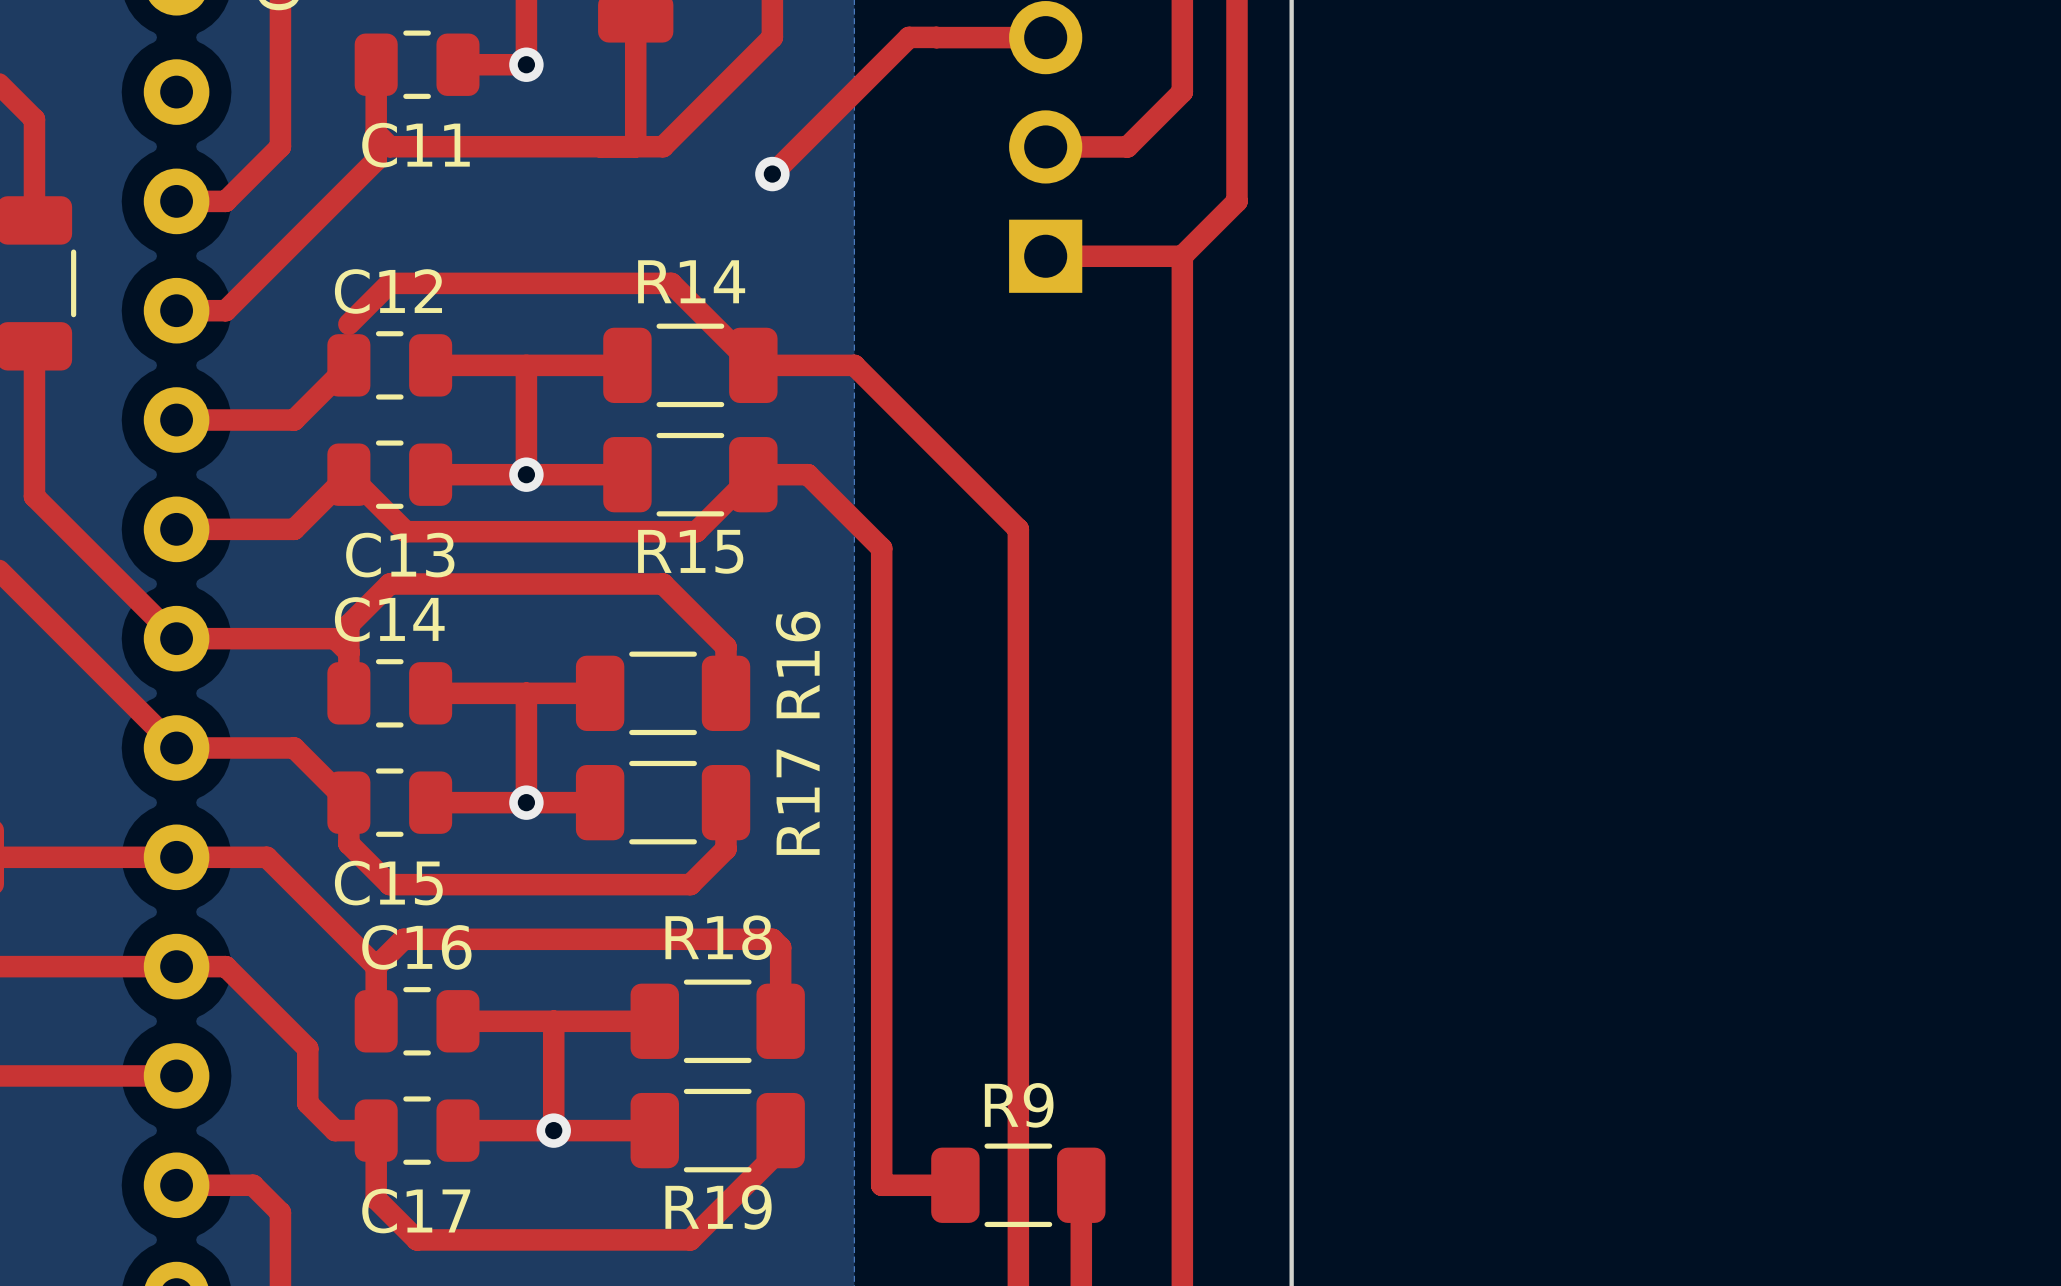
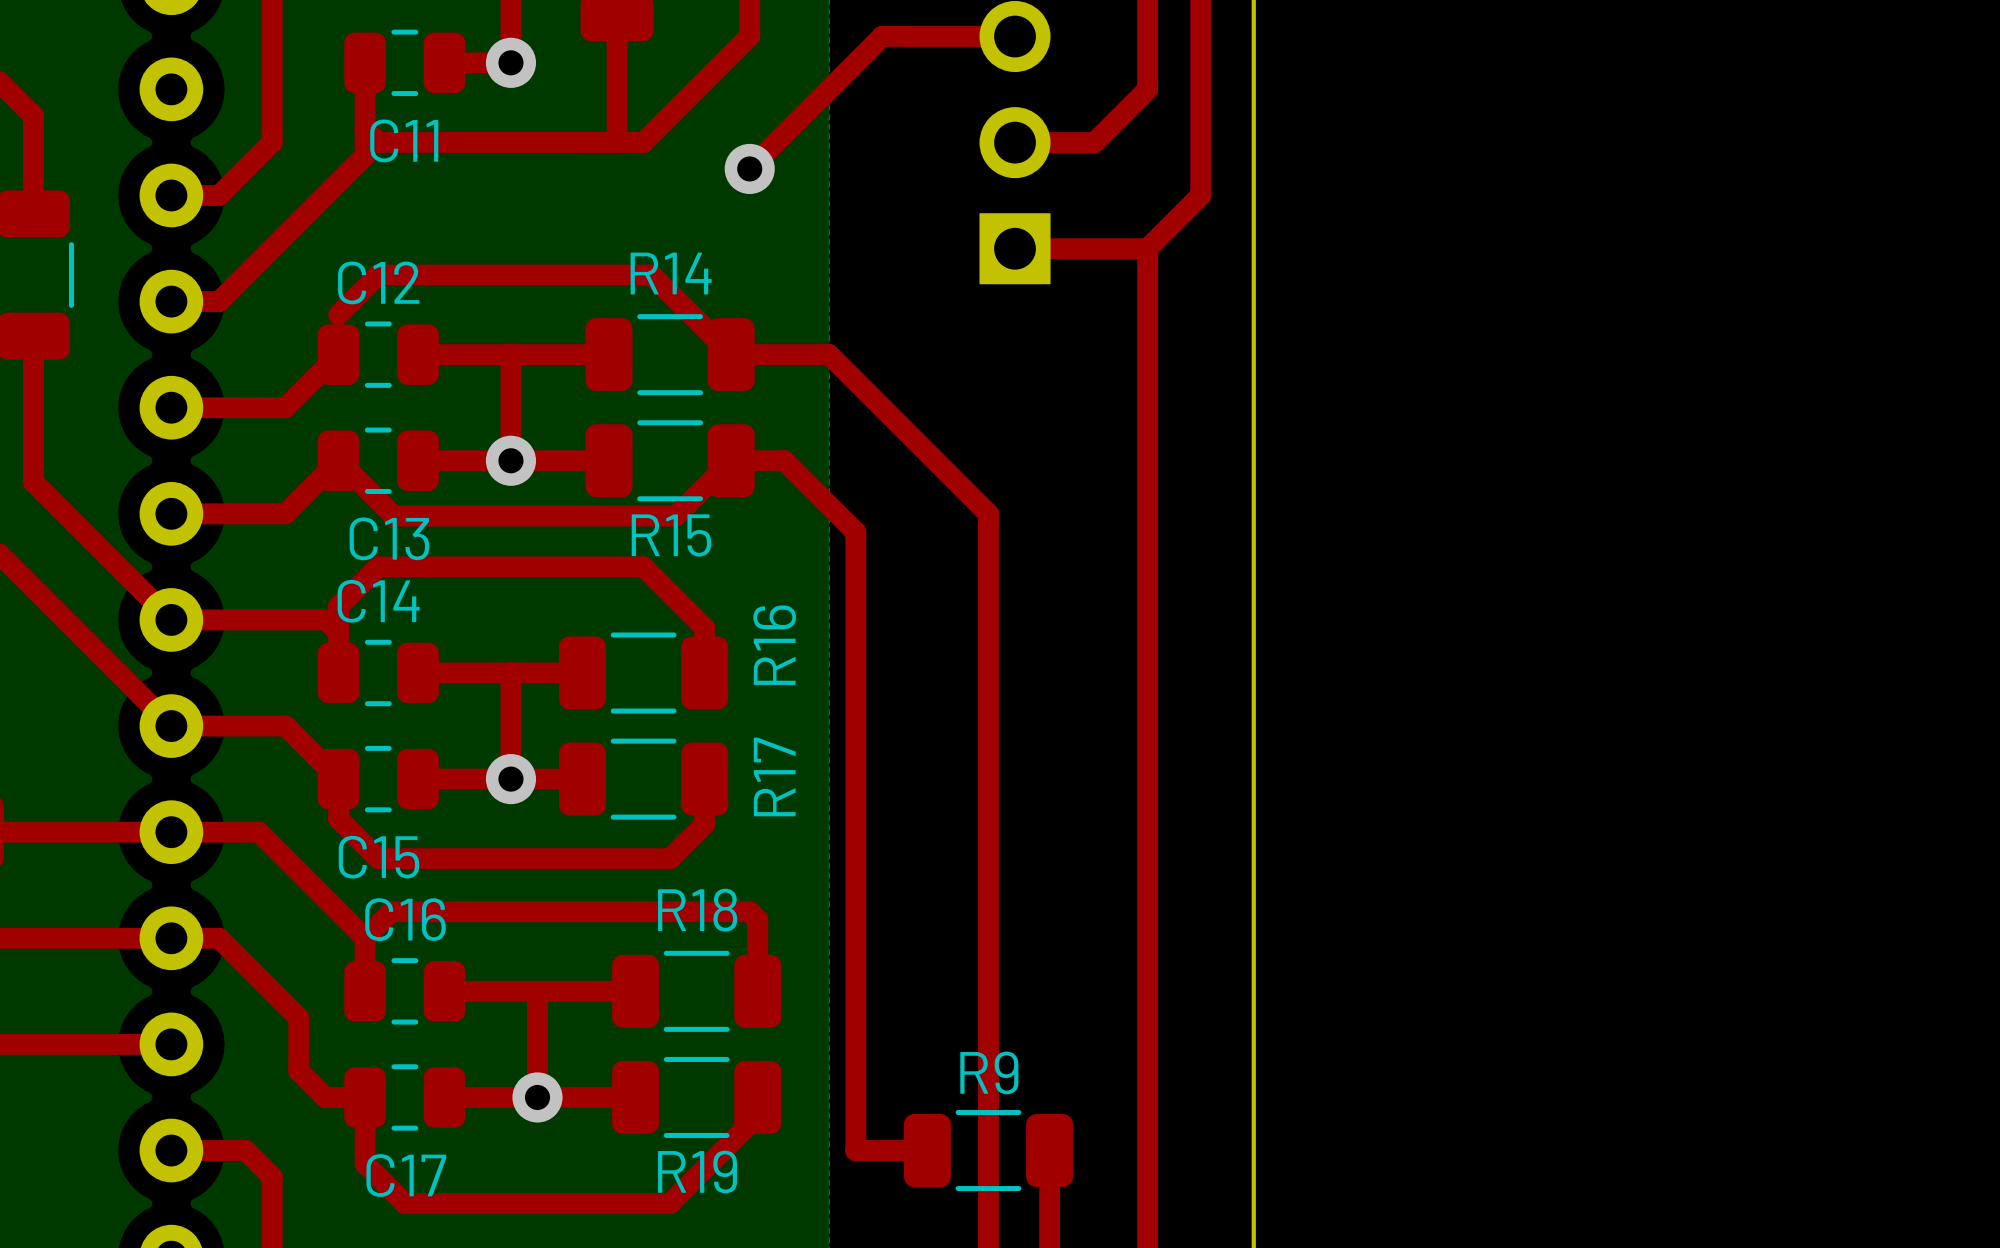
via size: [509, 47, 544, 82] -> [485, 37, 537, 88]
via size: [755, 156, 790, 192] -> [724, 143, 775, 195]
via size: [509, 457, 544, 492] -> [485, 435, 537, 486]
via size: [509, 785, 544, 820] -> [485, 754, 537, 805]
via size: [536, 1113, 571, 1148] -> [512, 1072, 563, 1123]

